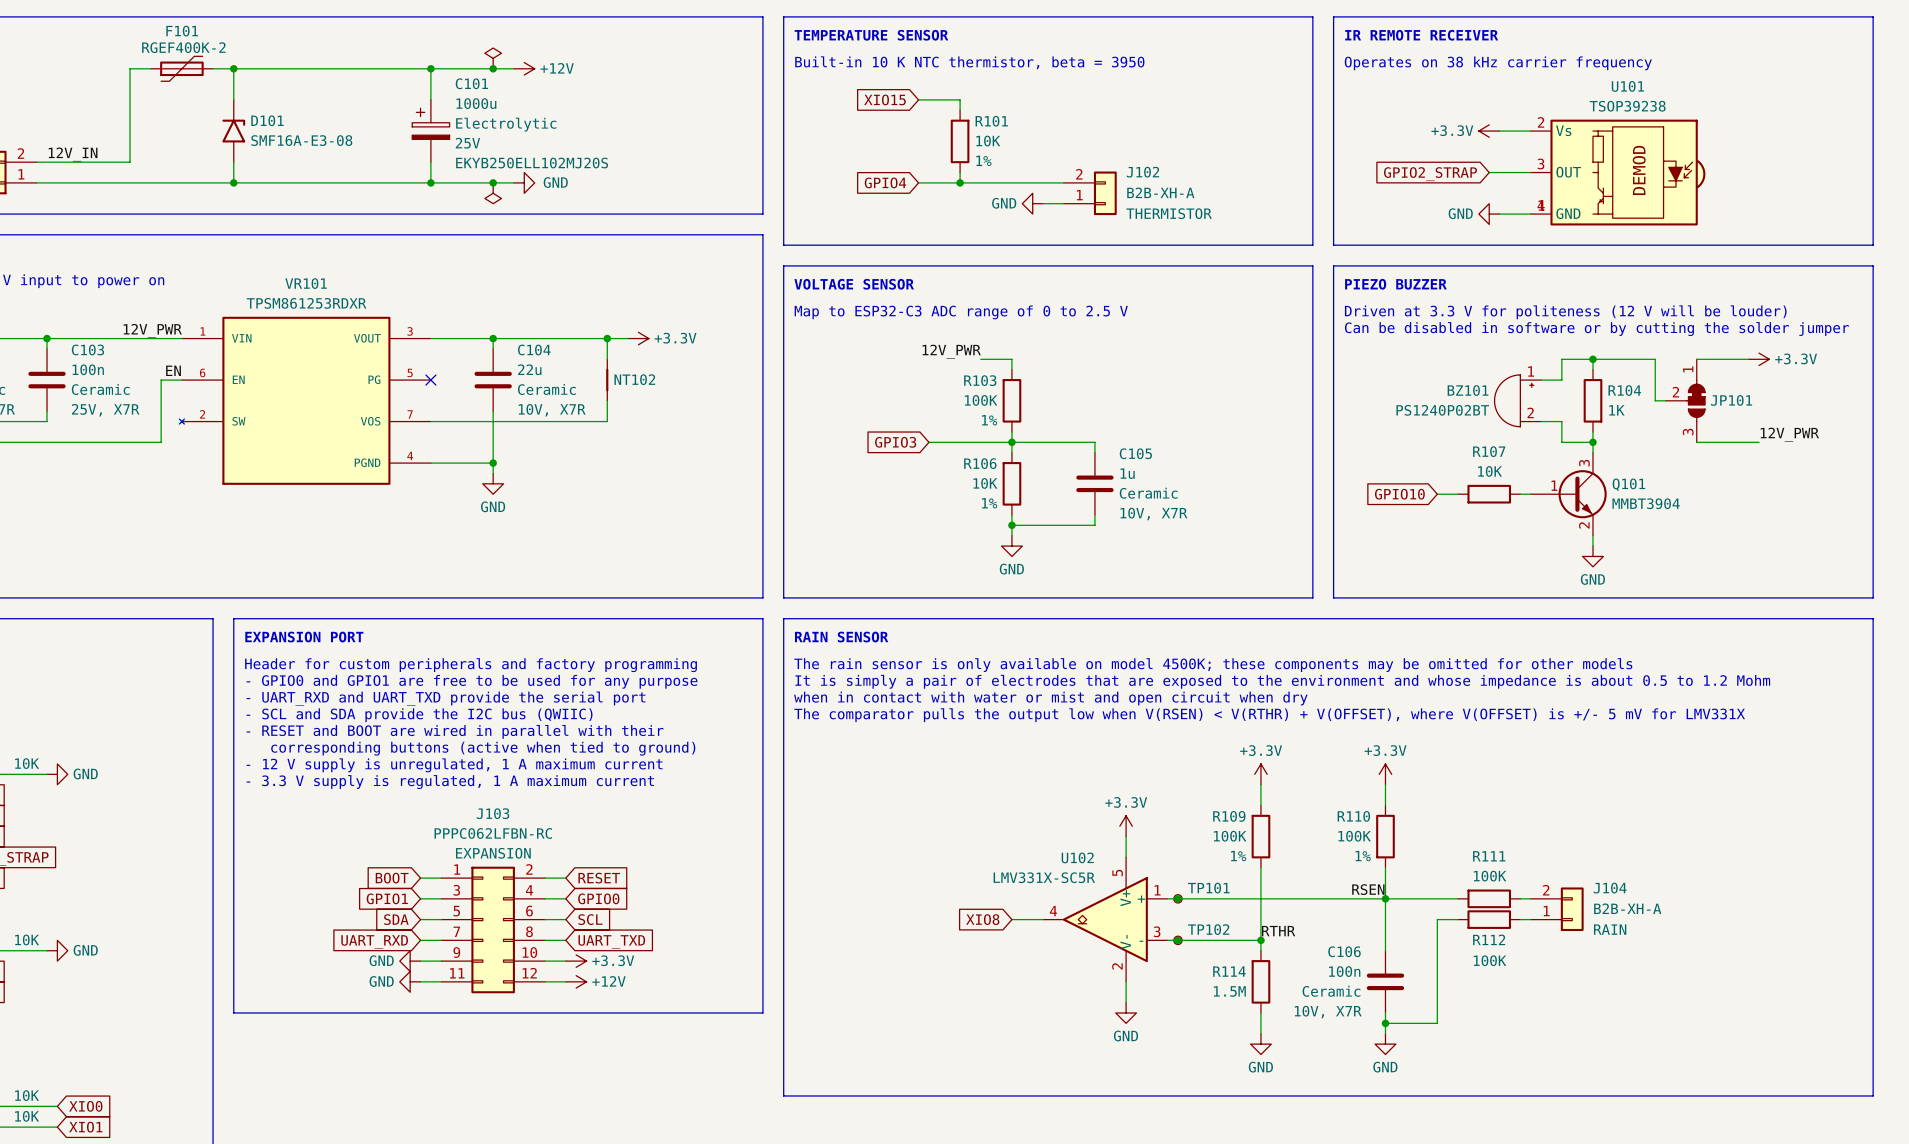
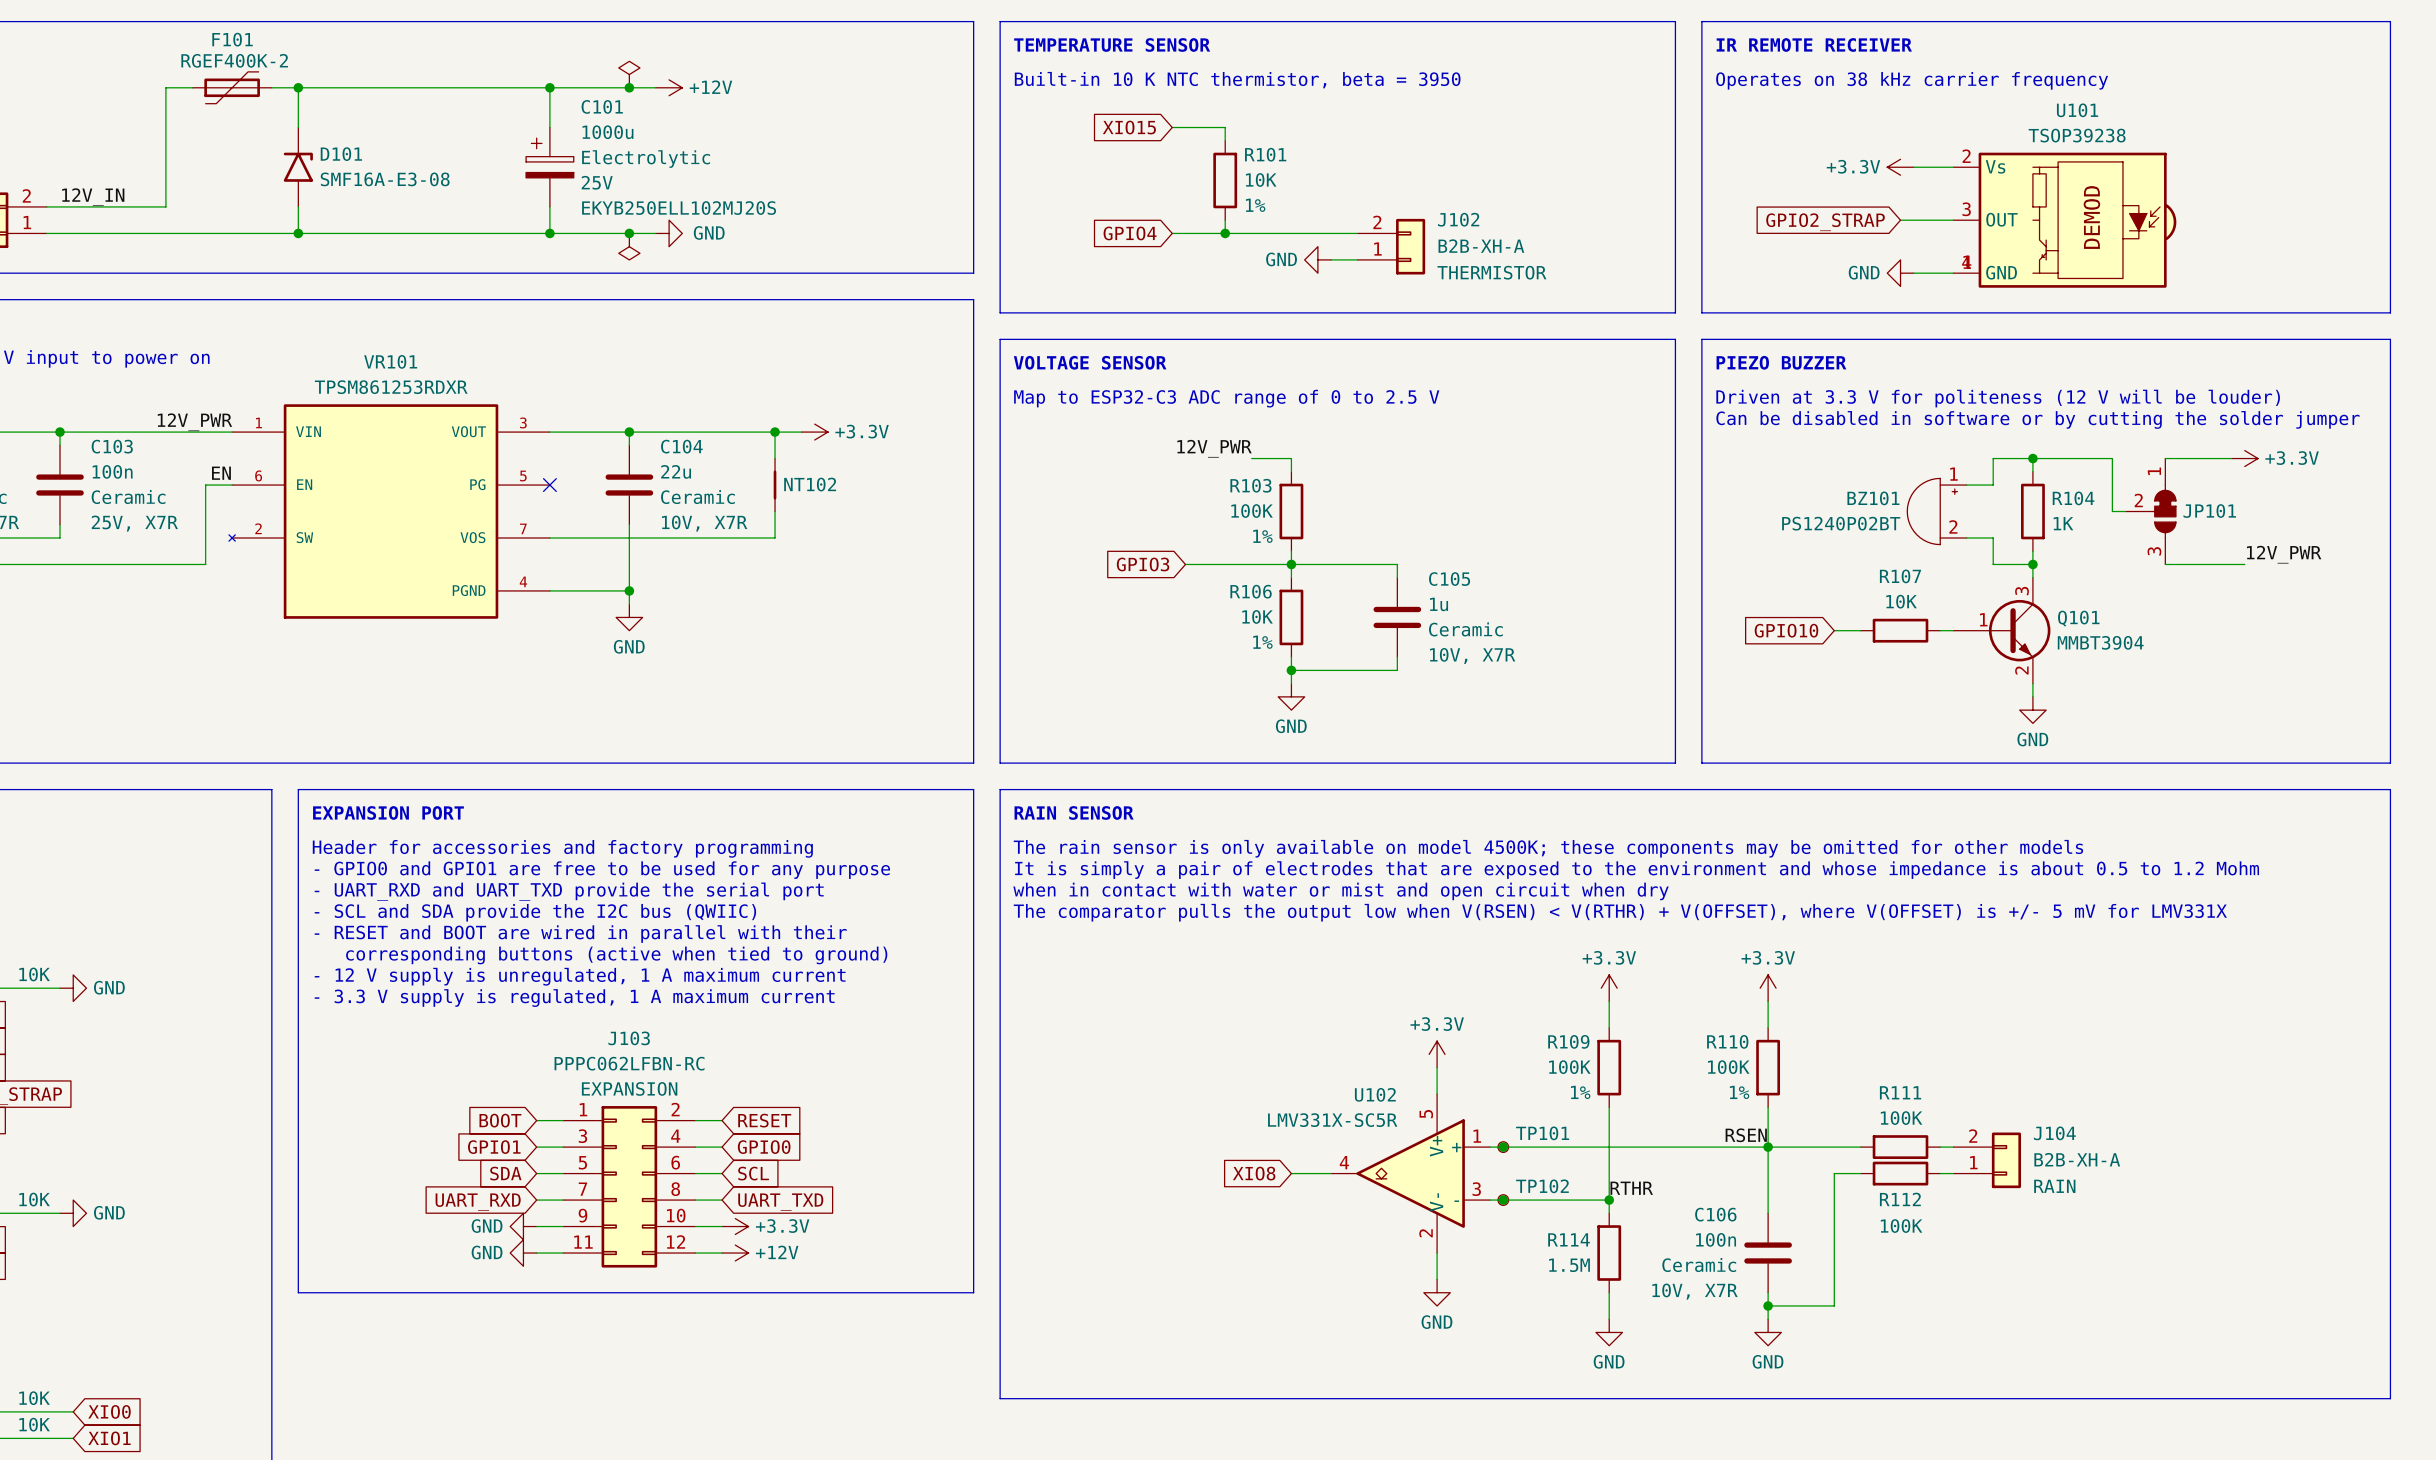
text: Header for custom peripherals and factory programming (471, 665) -> Header for accessories and factory programming (562, 848)

